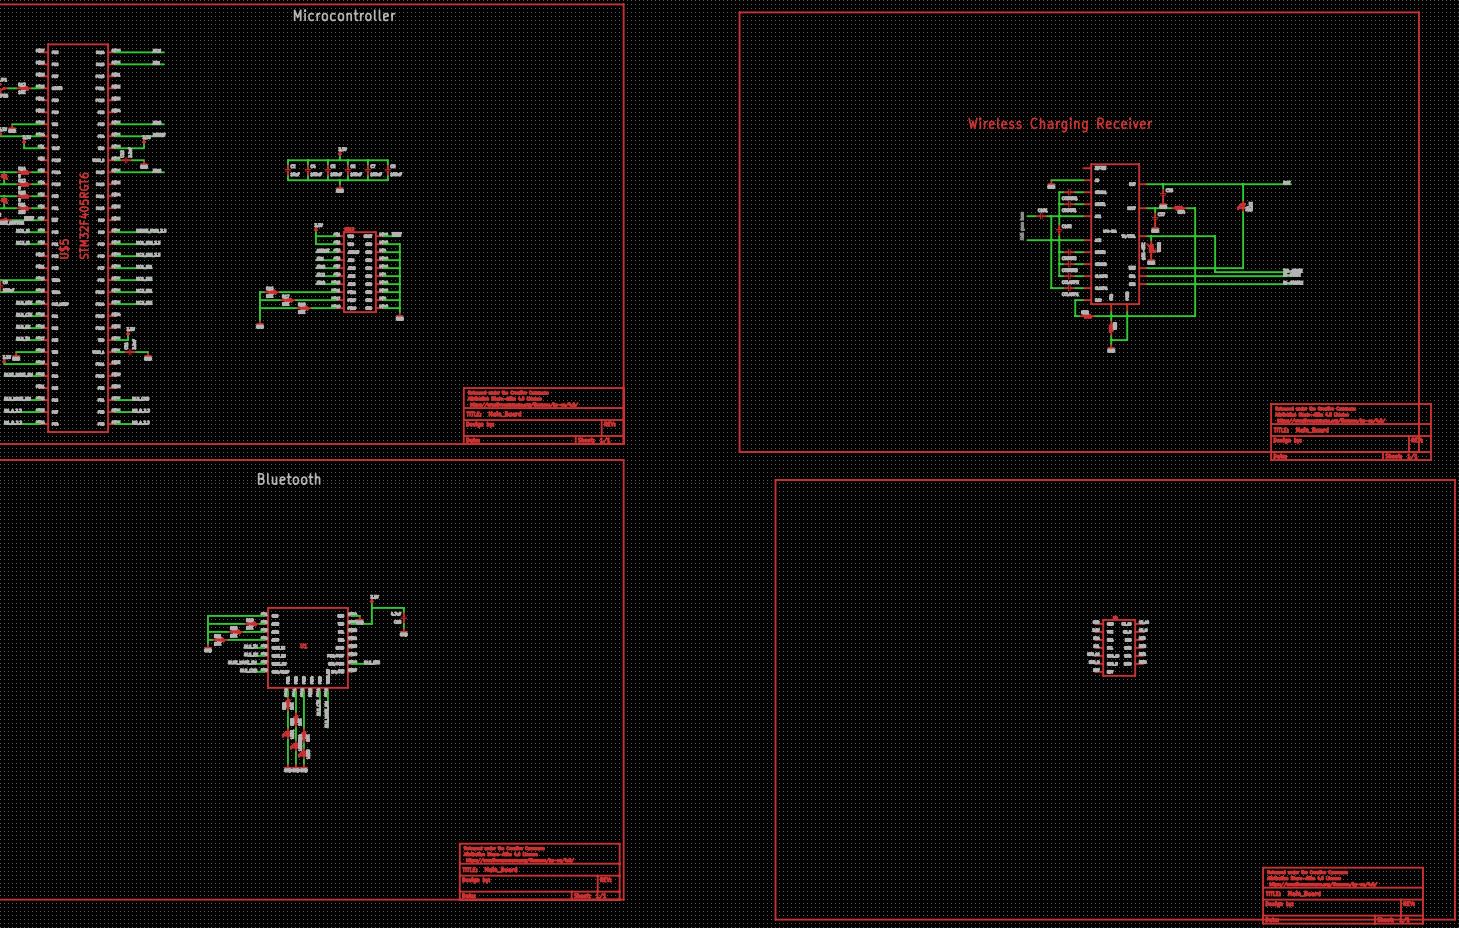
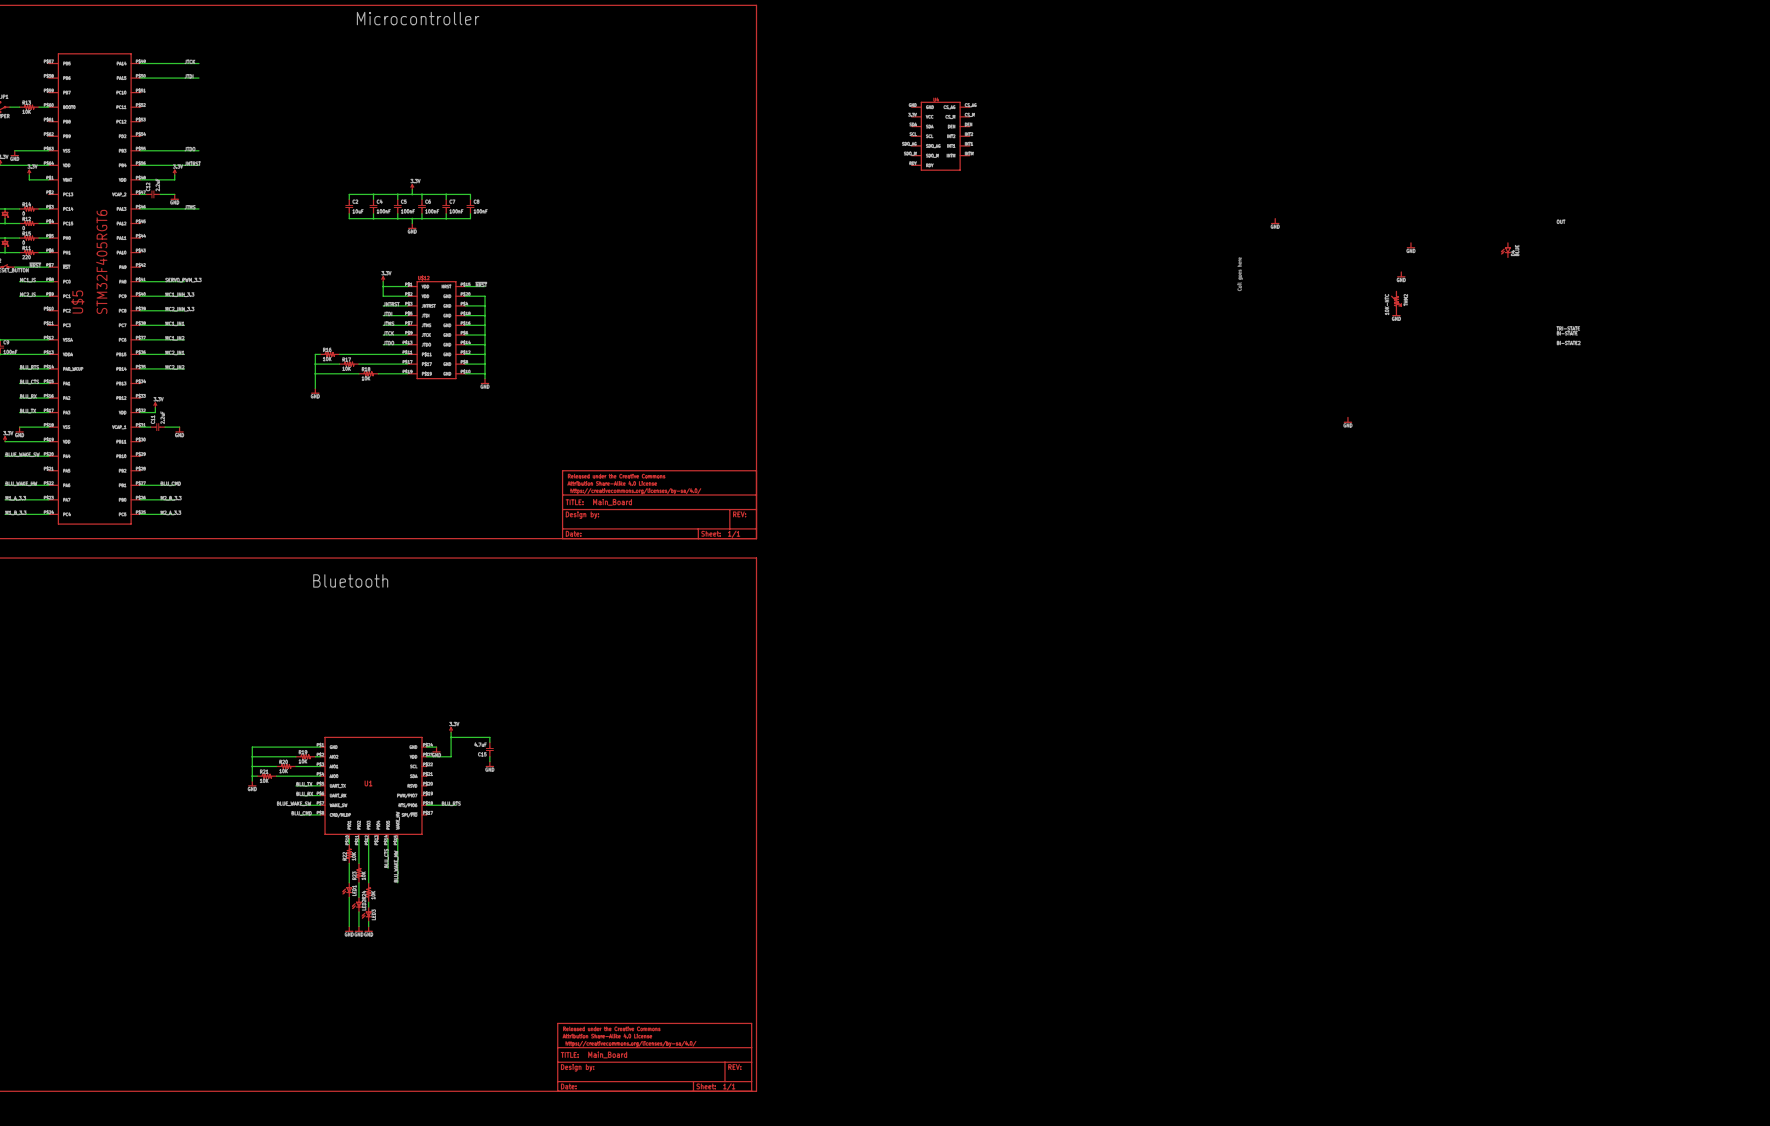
text: Wireless Charging Receiver (1060, 124) -> none
wire: (1051, 180) (1083, 180) -> none
wire: (1147, 184) (1291, 184) -> none
wire: (1163, 184) (1163, 188) -> none
wire: (1243, 184) (1243, 200) -> none
wire: (1063, 192) (1059, 192) (1059, 224) -> none
part: (1069, 192) -> none
wire: (1075, 192) (1083, 192) -> none
part: (1163, 194) -> none
wire: (1059, 204) (1063, 204) -> none
part: (1069, 204) -> none
wire: (1075, 204) (1083, 204) -> none
wire: (1147, 208) (1171, 208) -> none
wire: (1155, 208) (1155, 212) -> none
part: (1179, 208) -> none
wire: (1187, 208) (1195, 208) (1195, 316) (1095, 316) -> none
wire: (1243, 212) (1243, 268) (1147, 268) -> none
wire: (1027, 216) (1035, 216) -> none
part: (1041, 216) -> none
wire: (1047, 216) (1083, 216) -> none
wire: (1051, 216) (1051, 288) (1063, 288) -> none
part: (1155, 218) -> none
part: (1059, 230) -> none
part: (1079, 232) -> none
wire: (1059, 236) (1059, 276) (1063, 276) -> none
wire: (1147, 236) (1215, 236) (1215, 272) (1291, 272) -> none
wire: (1151, 236) (1151, 240) -> none
part: (1115, 238) -> none
wire: (1027, 240) (1083, 240) -> none
wire: (1059, 252) (1063, 252) -> none
part: (1069, 252) -> none
wire: (1075, 252) (1083, 252) -> none
wire: (1059, 264) (1063, 264) -> none
part: (1069, 264) -> none
wire: (1075, 264) (1083, 264) -> none
part: (1069, 276) -> none
wire: (1075, 276) (1083, 276) -> none
wire: (1147, 276) (1291, 276) -> none
wire: (1147, 284) (1291, 284) -> none
part: (1069, 288) -> none
wire: (1075, 288) (1083, 288) -> none
wire: (1083, 300) (1075, 300) (1075, 316) (1079, 316) -> none
wire: (1111, 312) (1111, 320) -> none
wire: (1127, 312) (1127, 340) (1111, 340) -> none
part: (1087, 316) -> none
part: (1111, 328) -> none
wire: (1111, 336) (1111, 344) -> none
part: (1351, 432) -> none
part position: (1119, 647) -> (940, 136)
part: (1115, 699) -> none
part: (1343, 895) -> none

